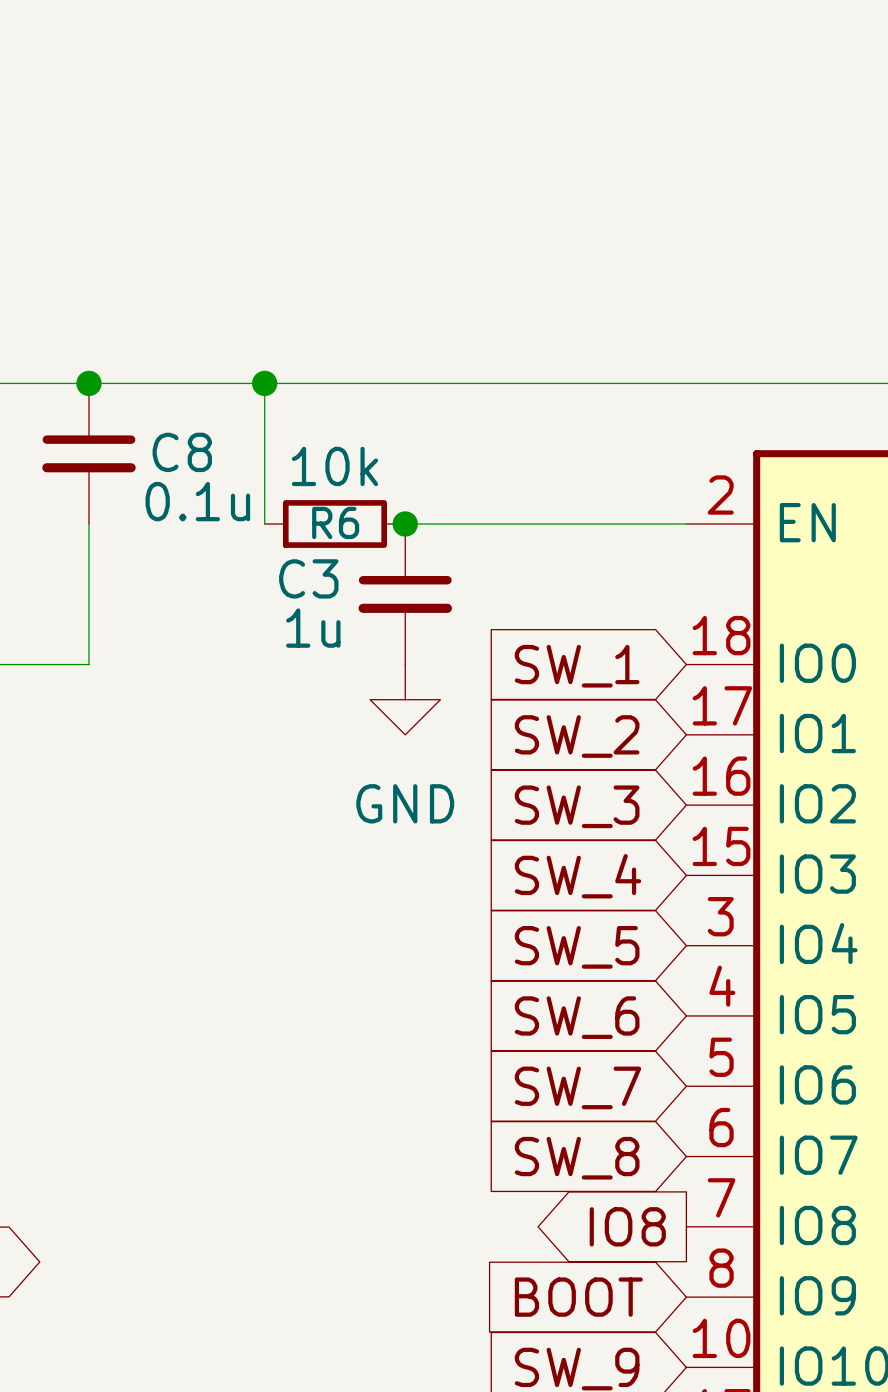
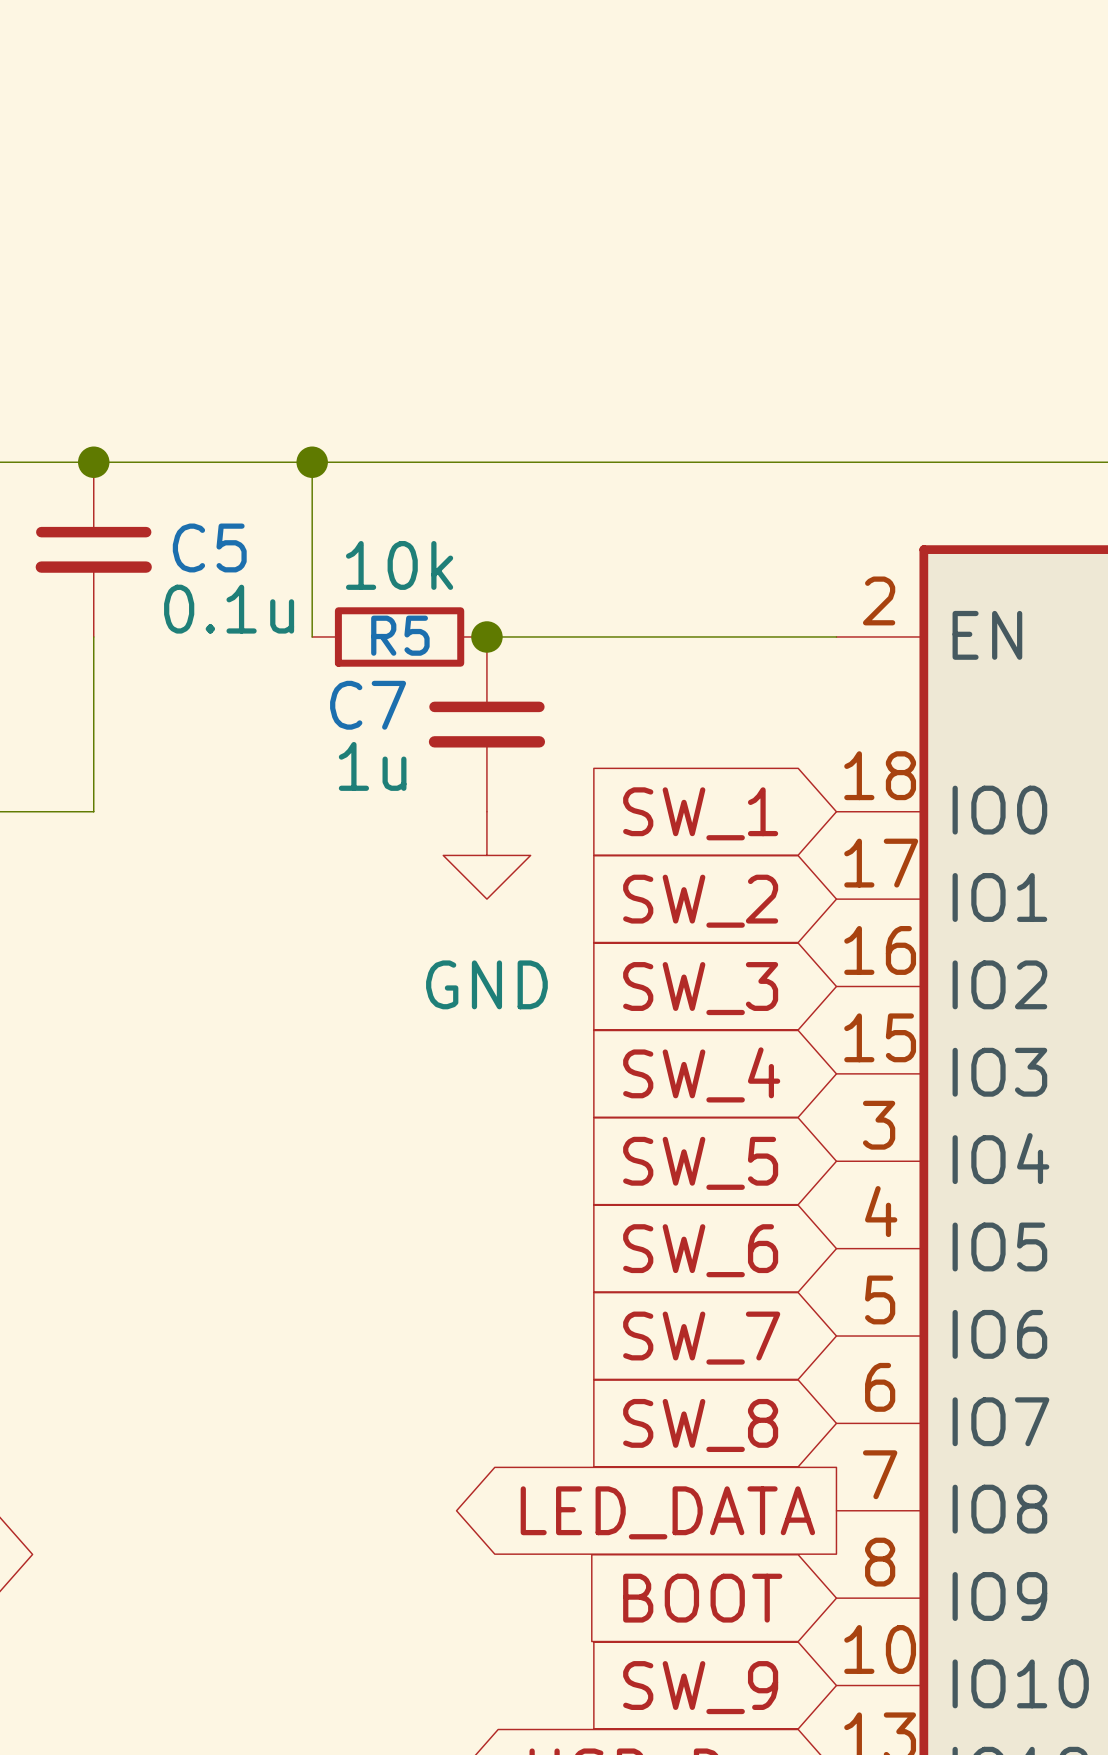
C8 name: C8 (182, 452) -> C5 (209, 547)
R6 name: R6 (335, 522) -> R5 (400, 635)
C3 name: C3 (308, 578) -> C7 (368, 705)
global label: IO8 (627, 1226) -> LED_DATA (667, 1512)

